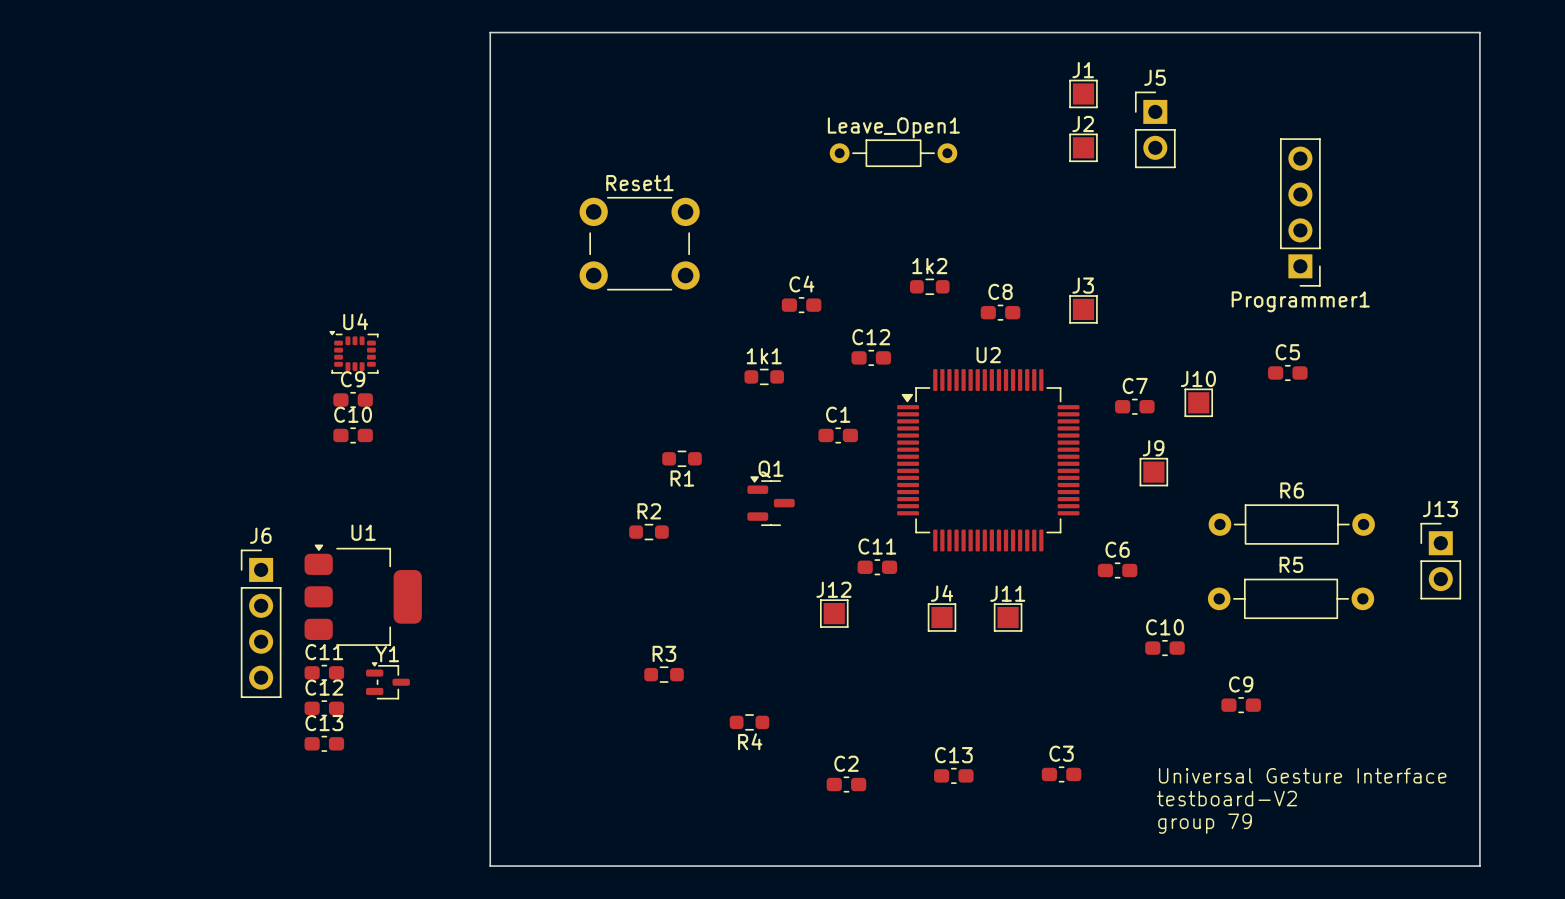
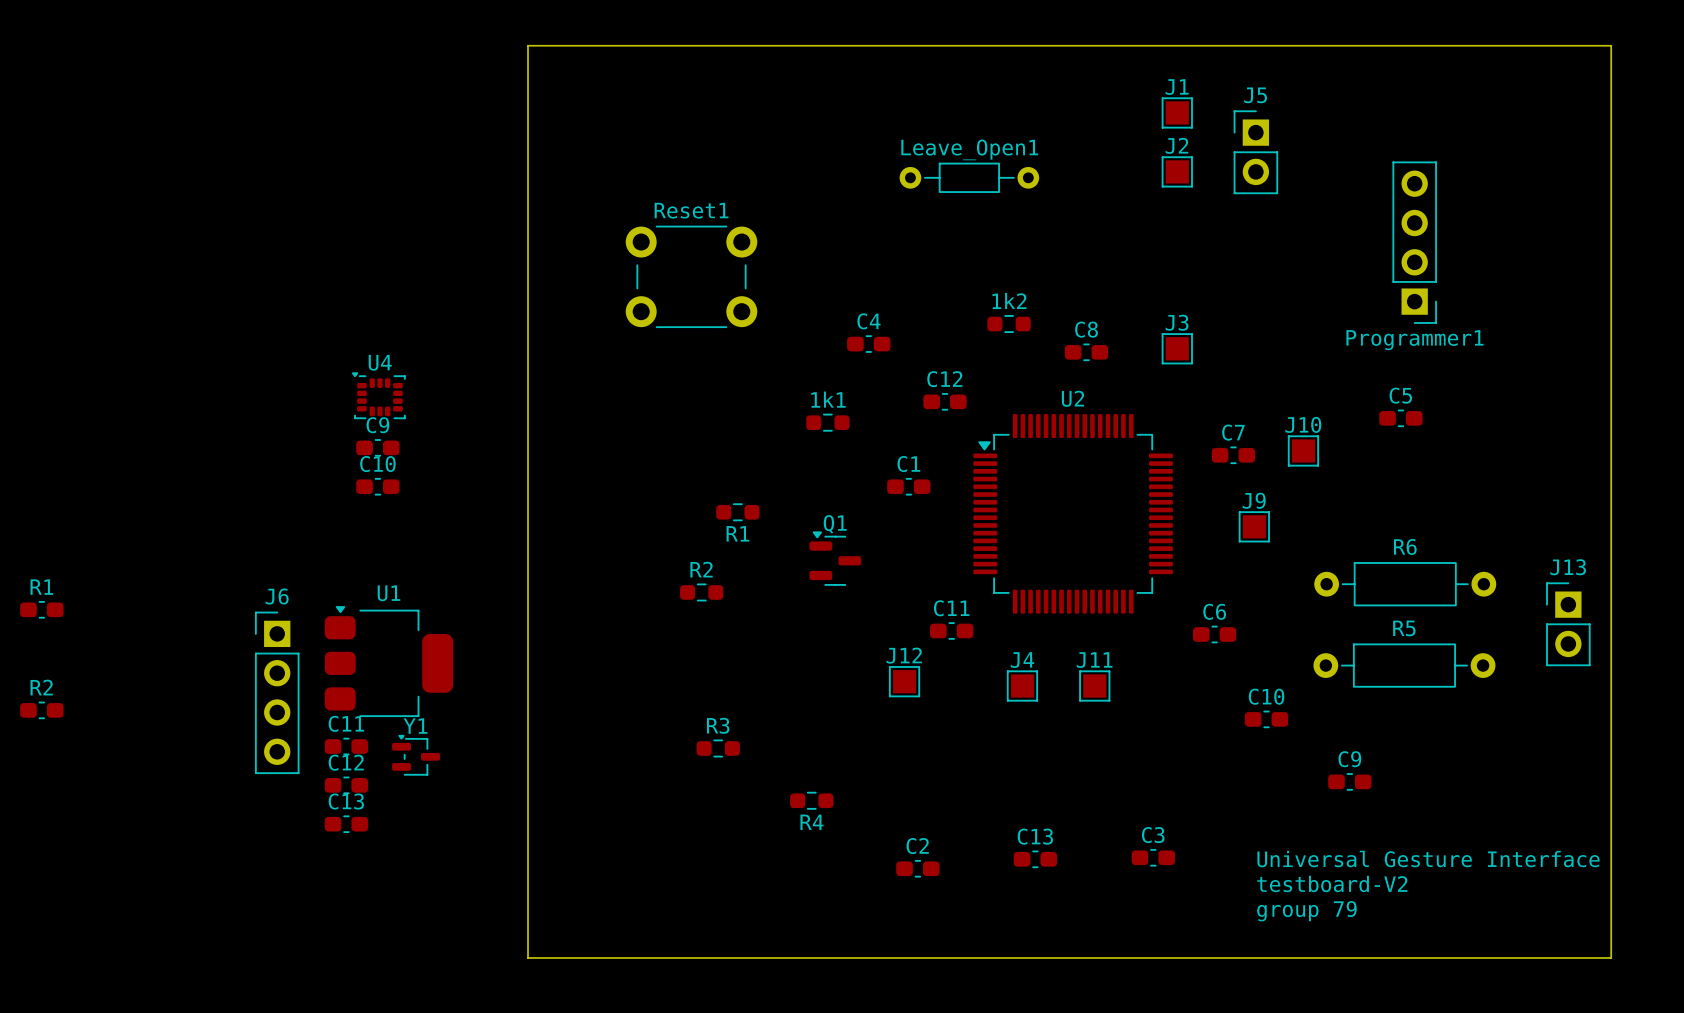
R1: none -> (41, 609)
R2: none -> (41, 710)

